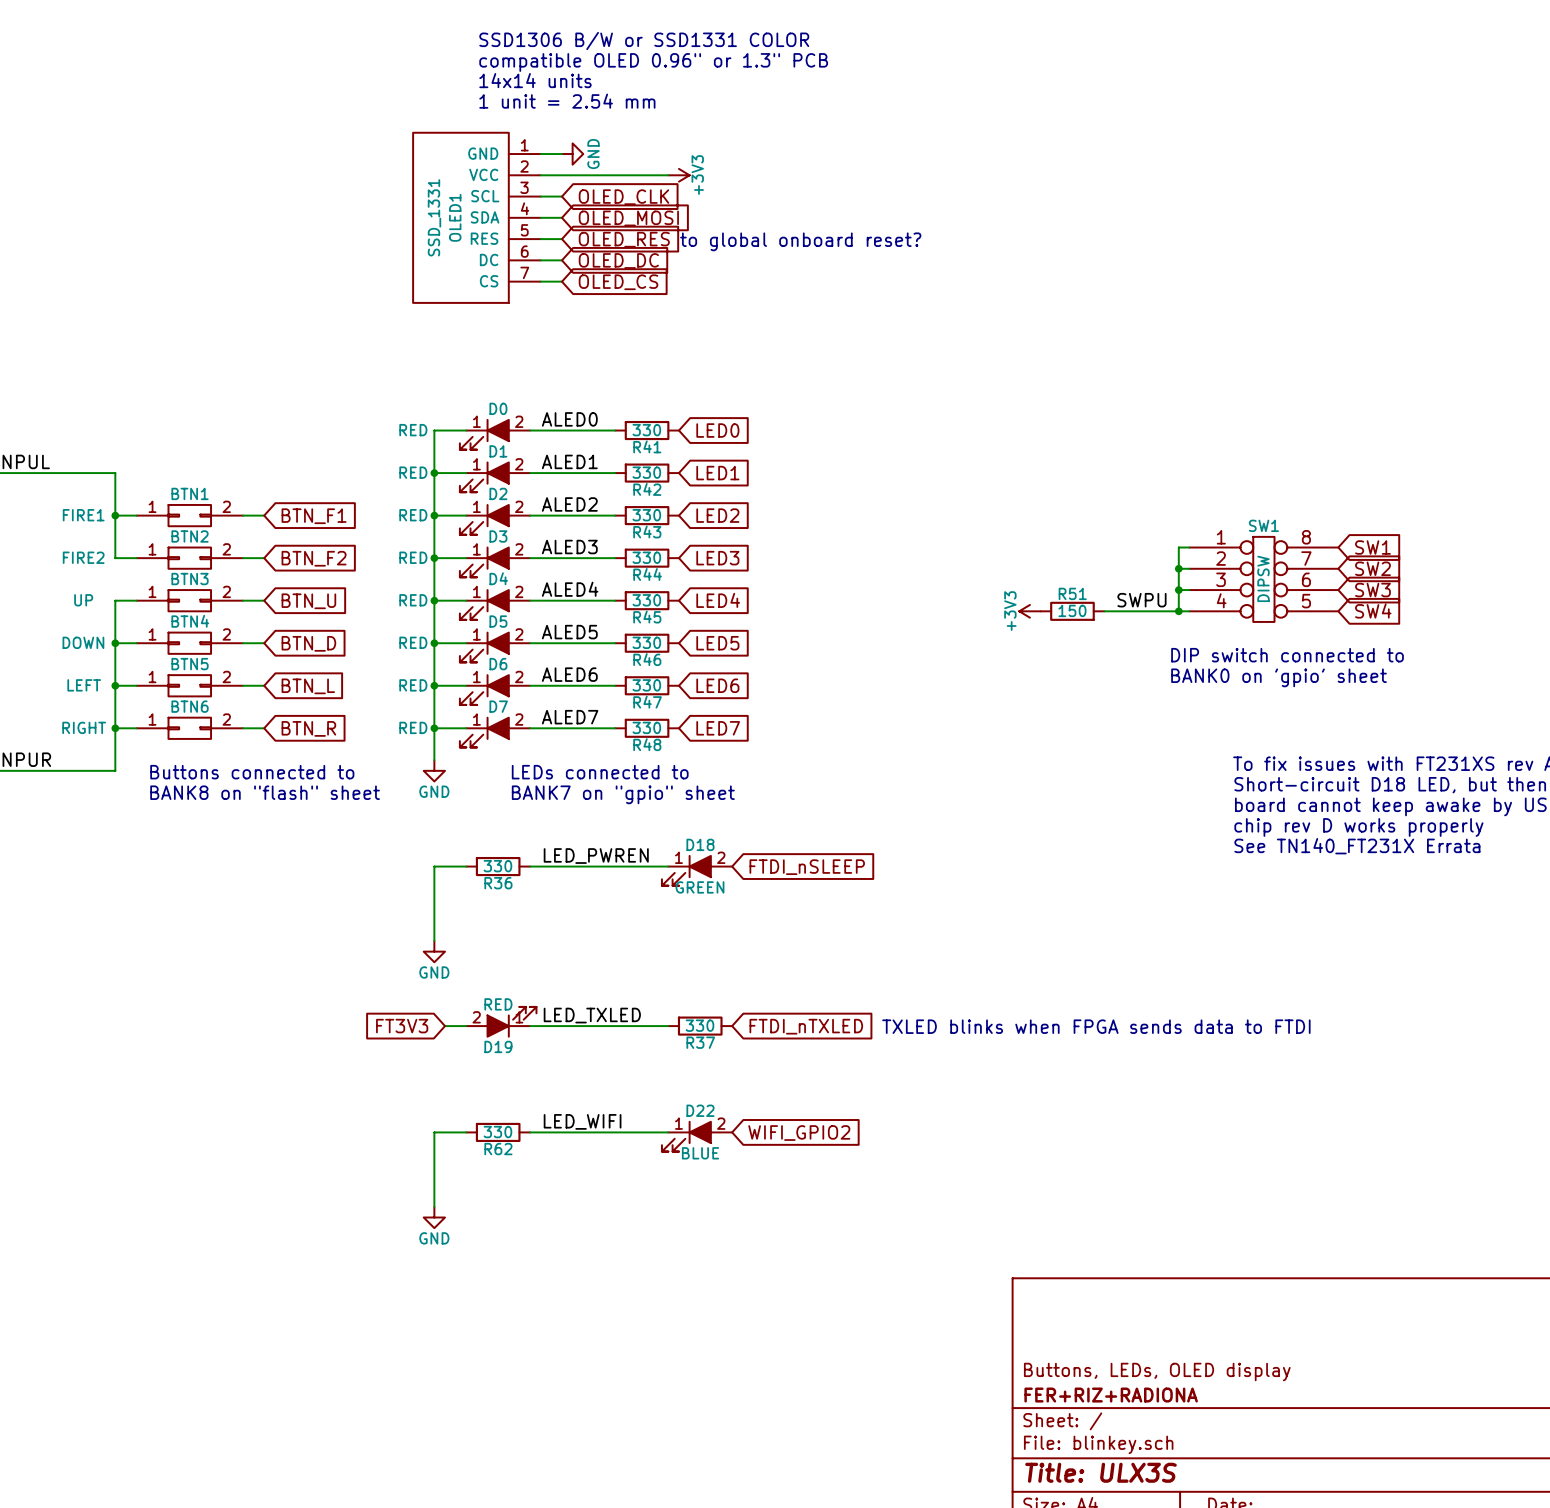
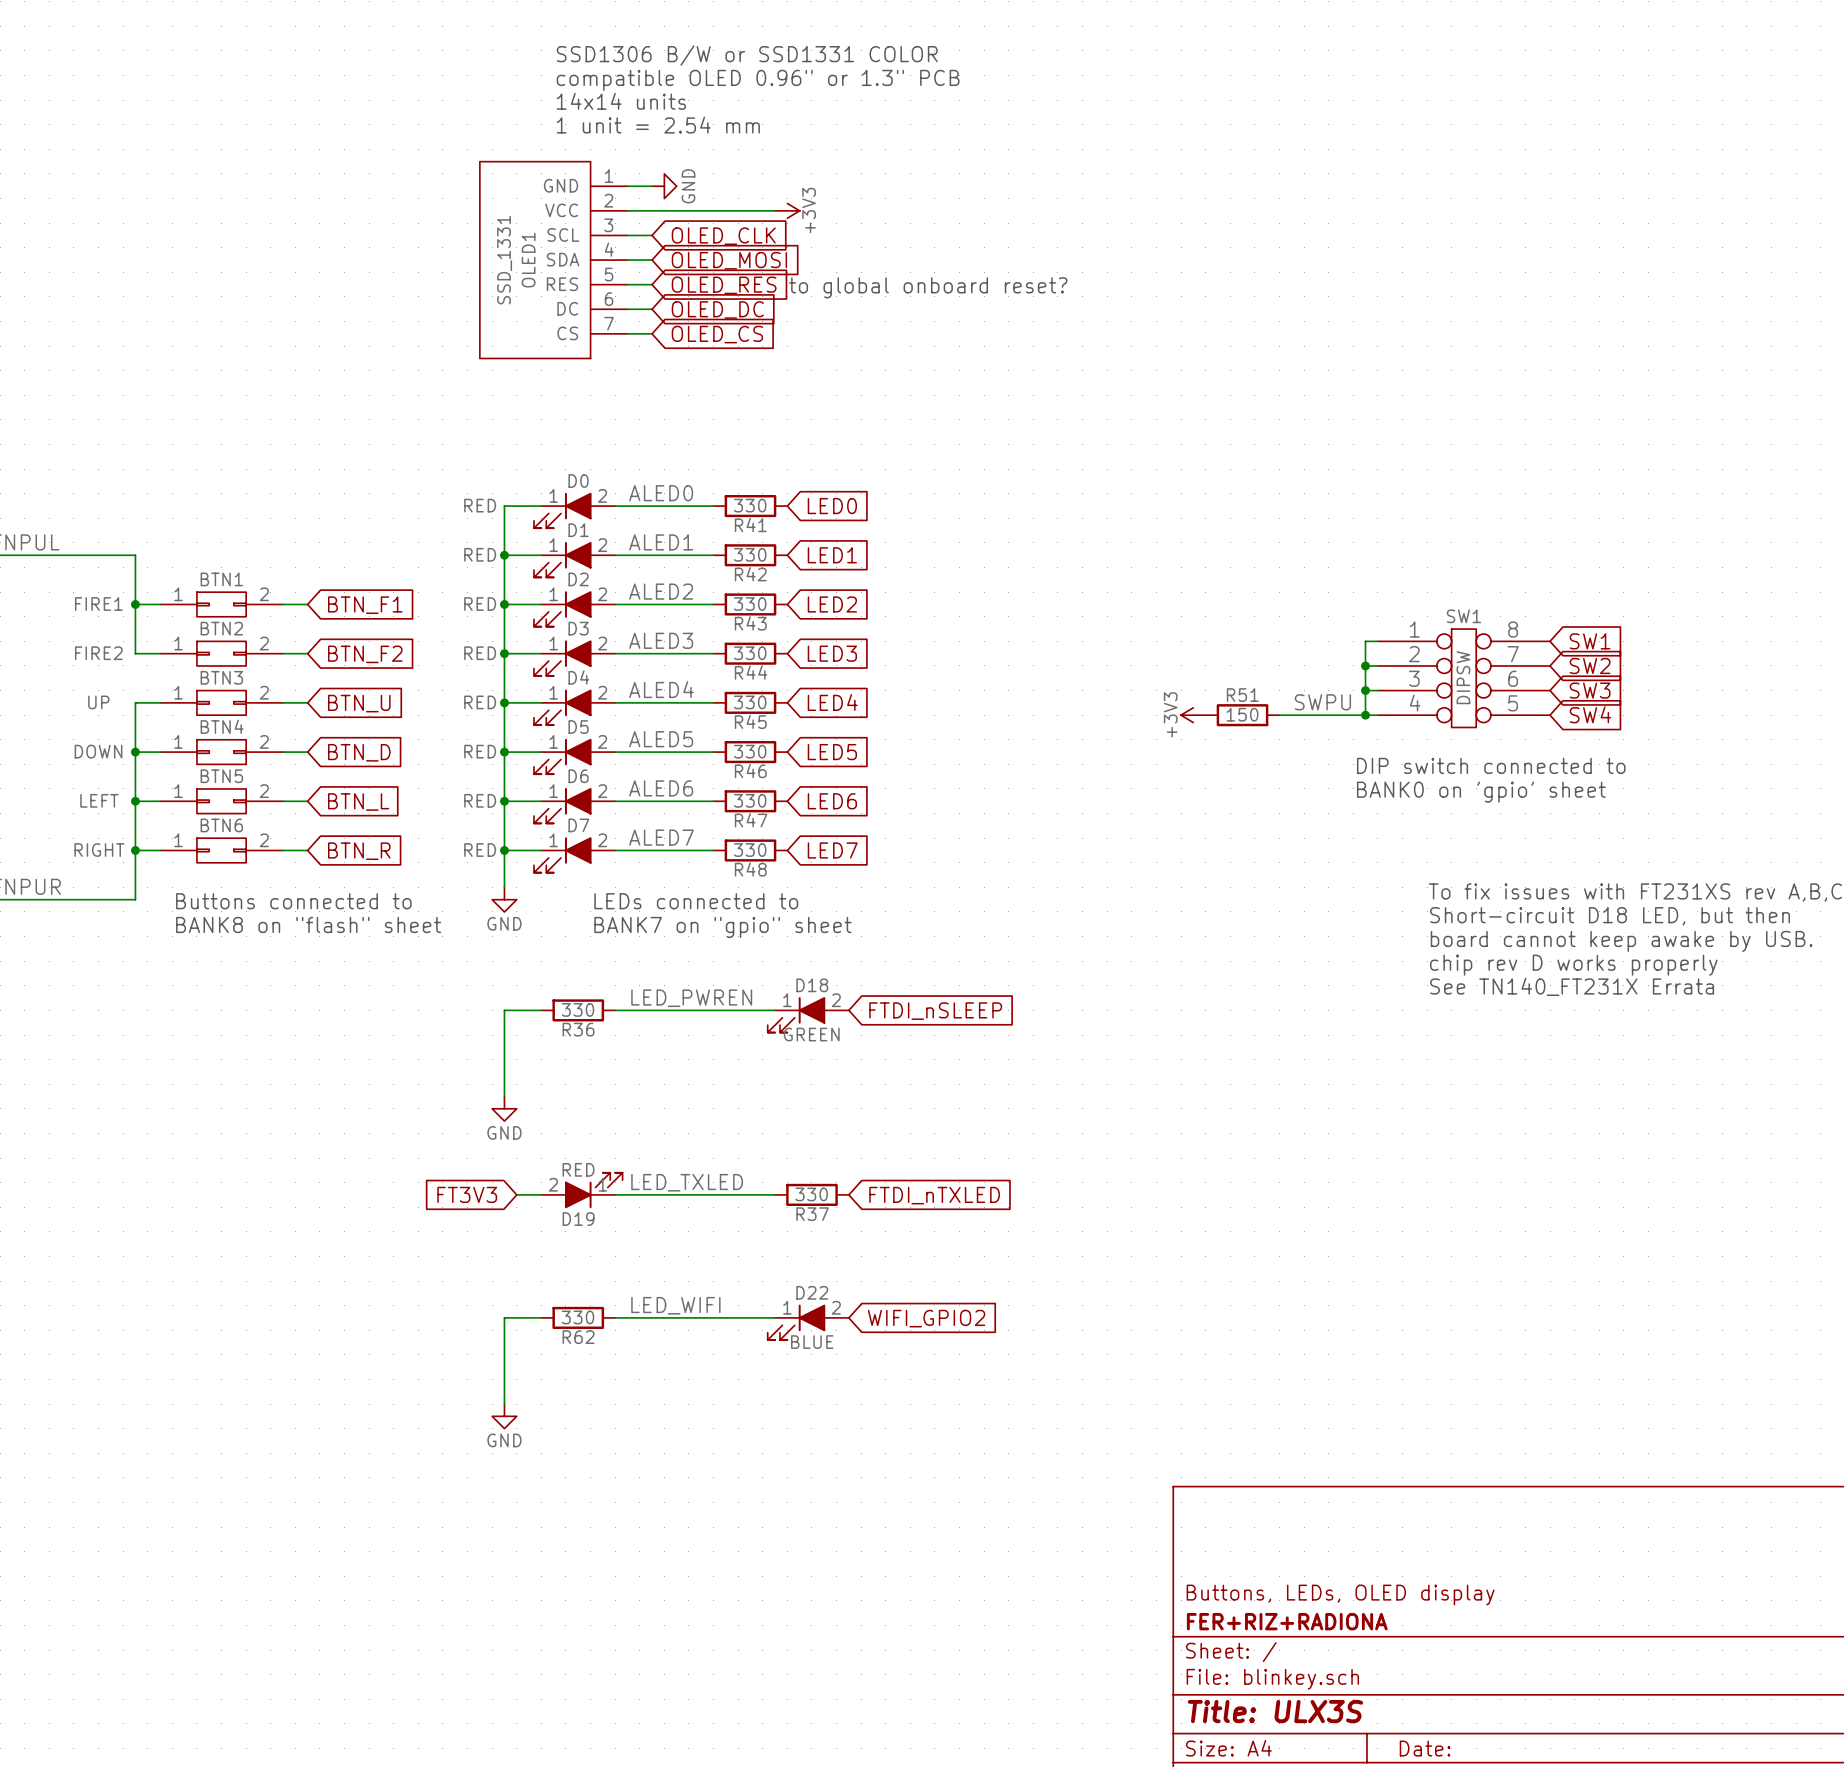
text: TXLED blinks when FPGA sends data to FTDI (1096, 1026) -> none

